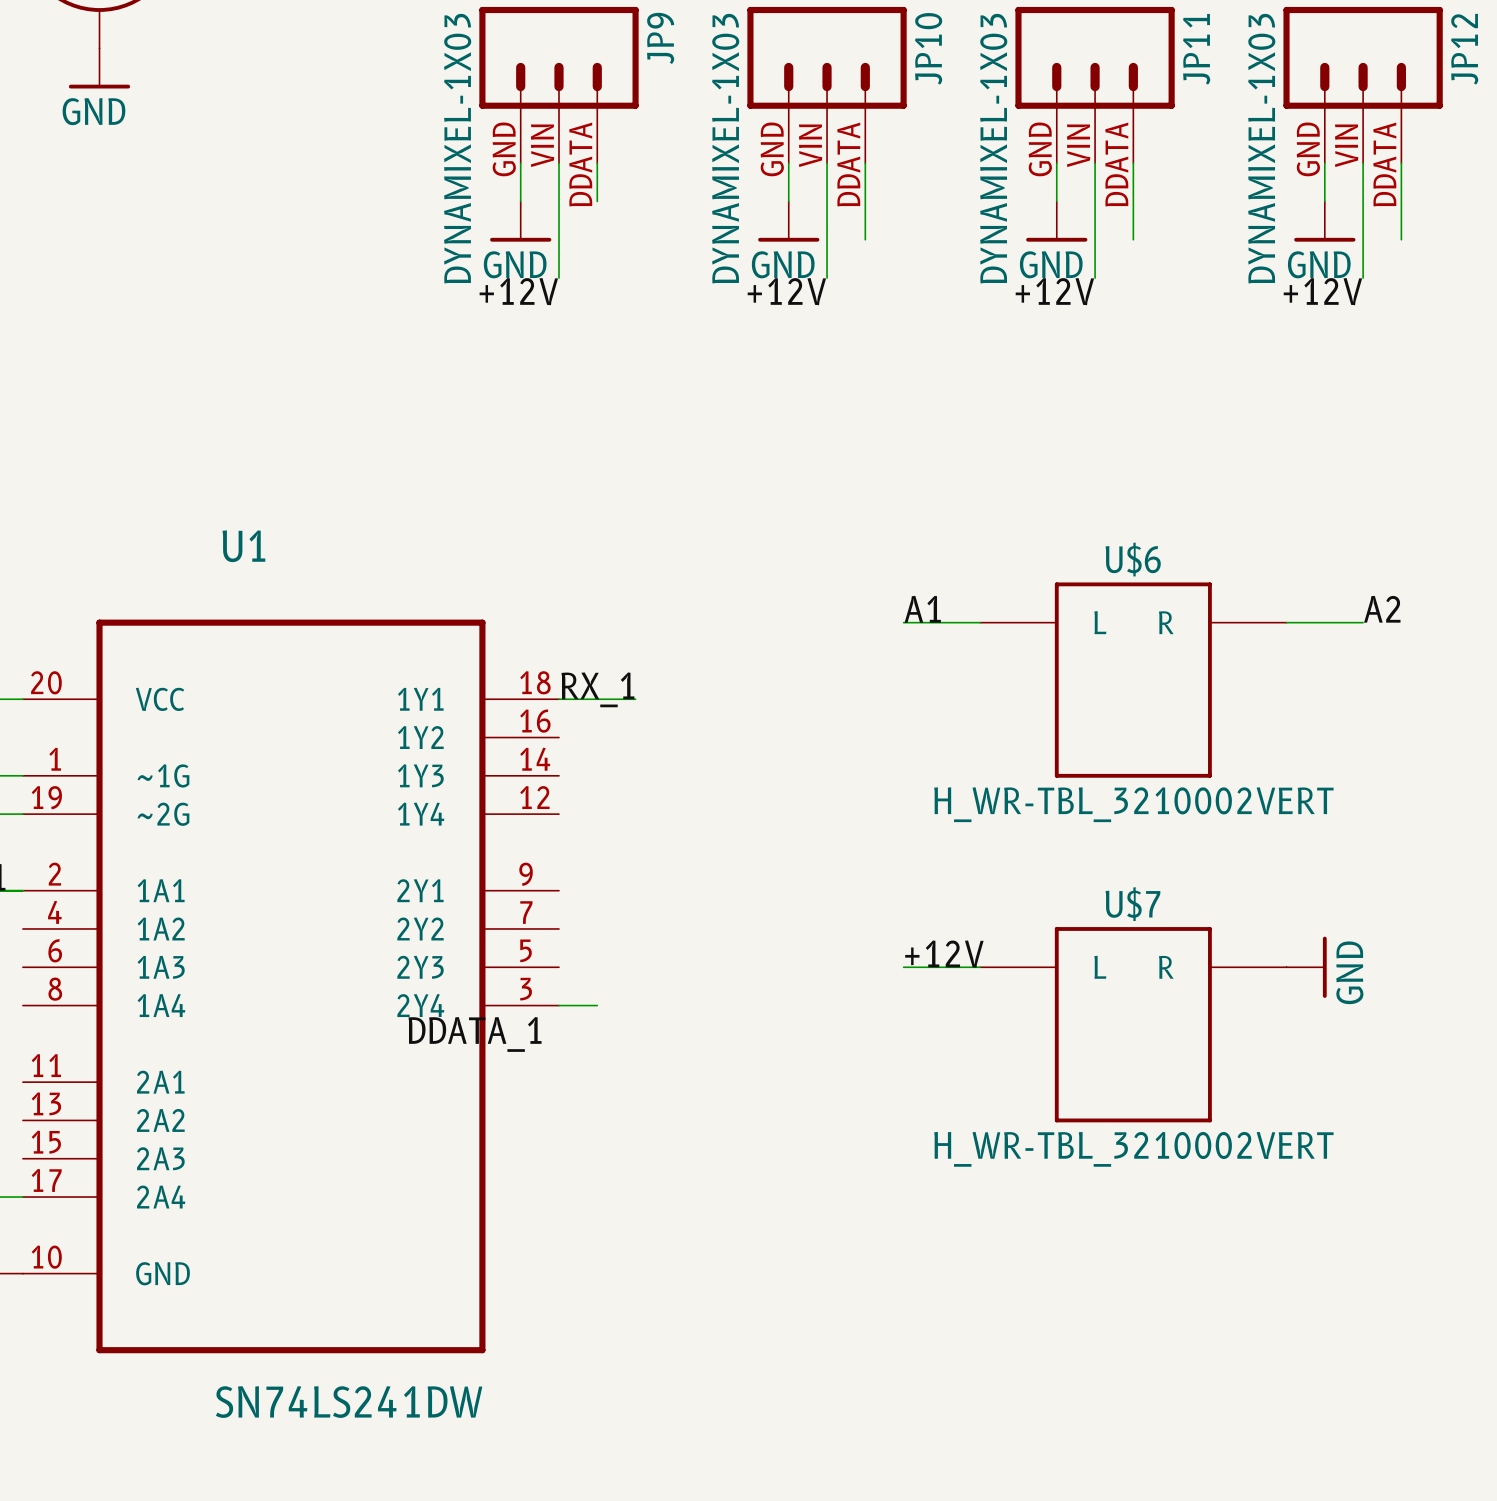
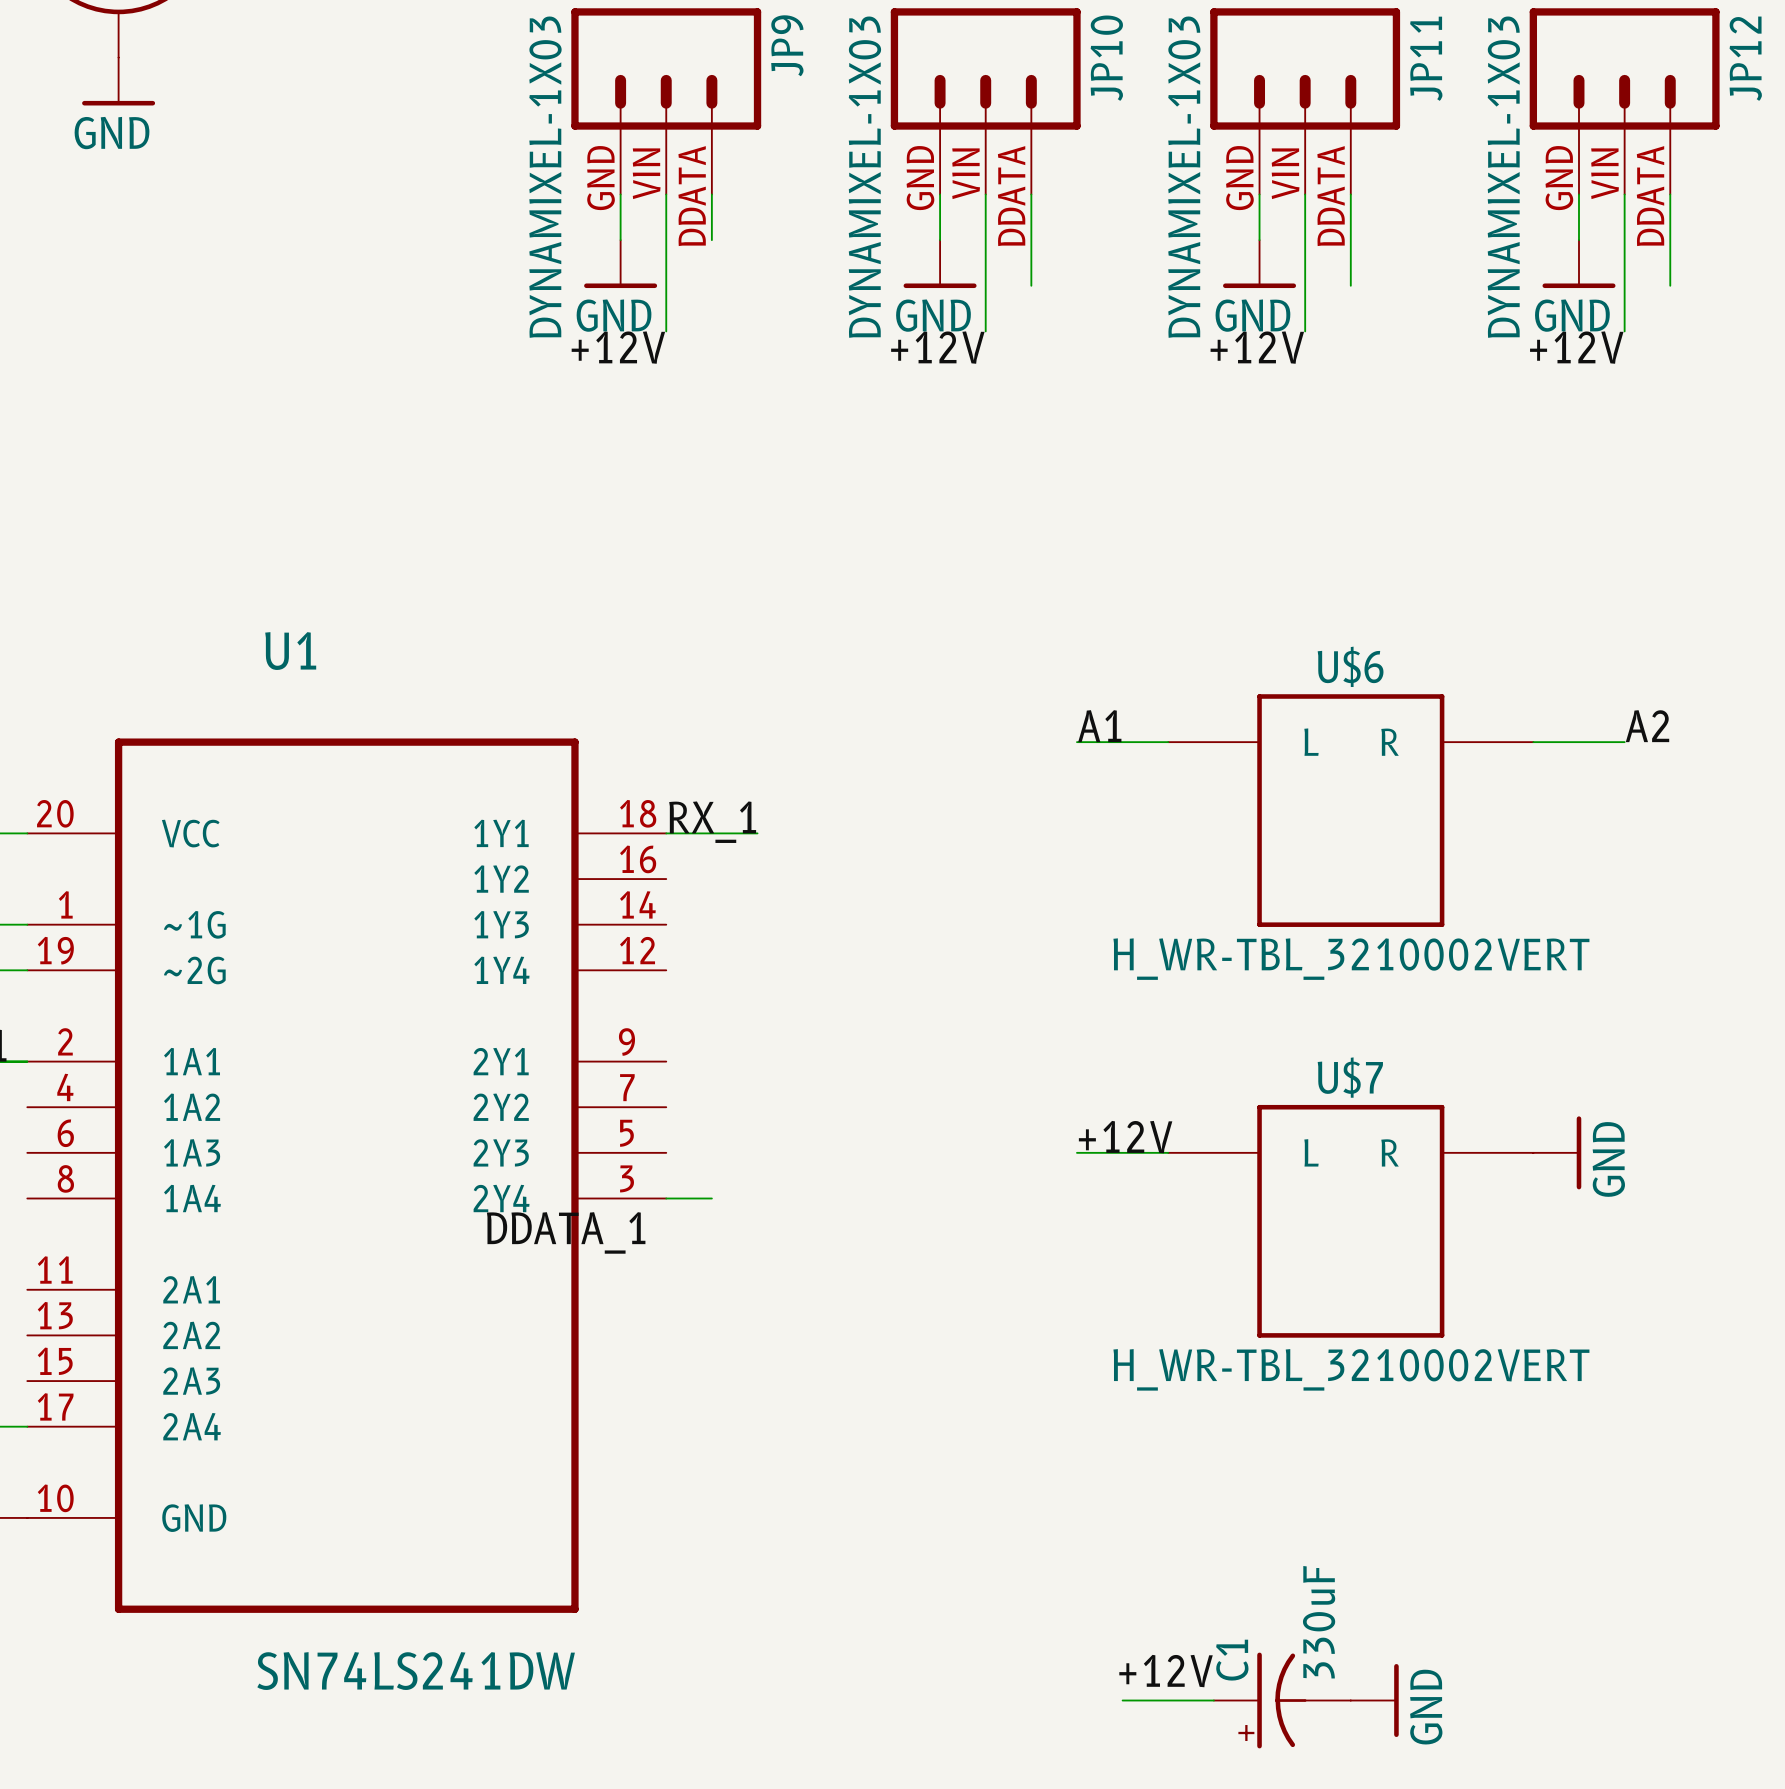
label: none -> +12V (1166, 1671)
wire: none -> (1122, 1700) (1213, 1700)
C1: none -> 330uF (1282, 1700)
power symbol: none -> GND (1374, 1700)

